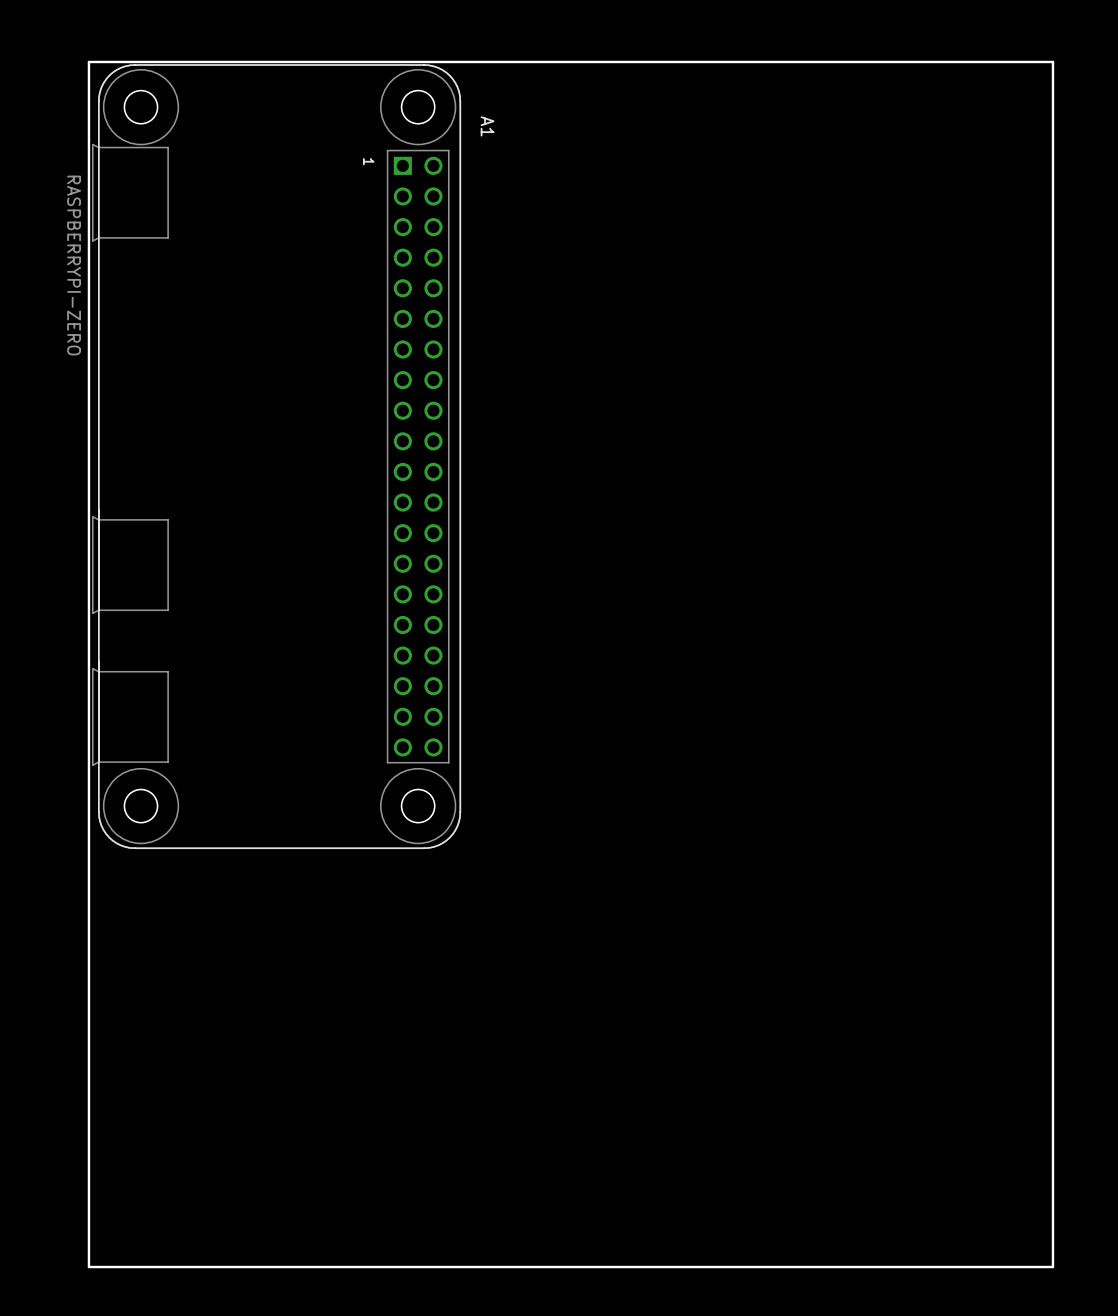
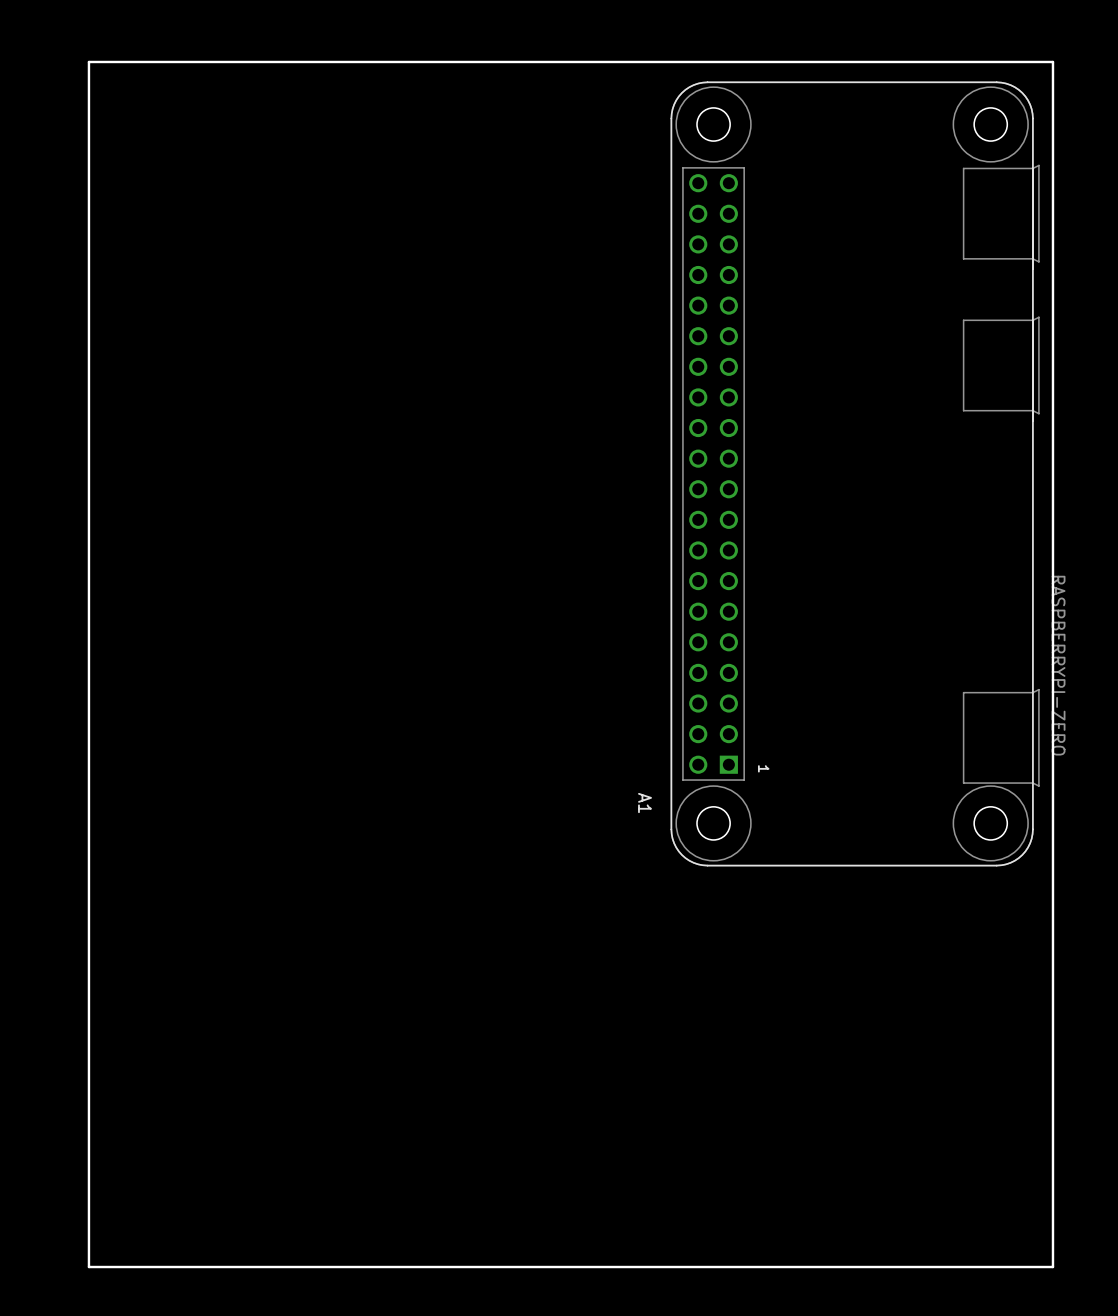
A1 rotation: 0° (276, 456) -> 180° (855, 473)
A1 position: (276, 456) -> (855, 473)

